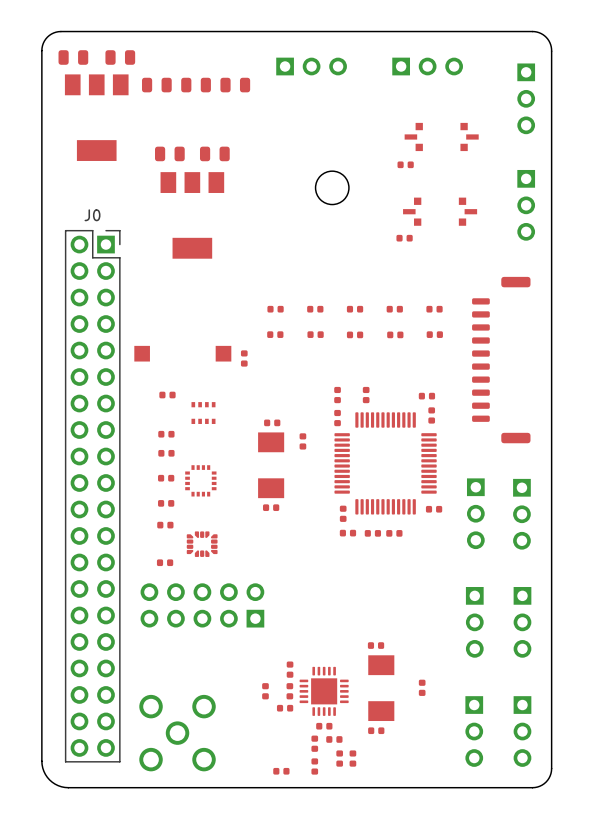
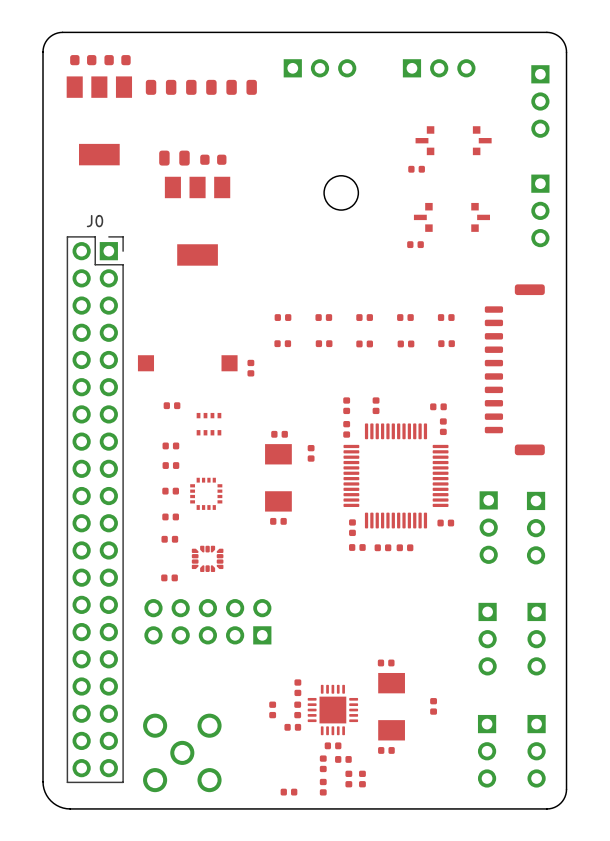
part footprint: [58, 50, 89, 65] -> [70, 55, 97, 66]
part footprint: [105, 50, 136, 65] -> [104, 55, 131, 66]
part footprint: [199, 146, 230, 162] -> [200, 154, 227, 165]

